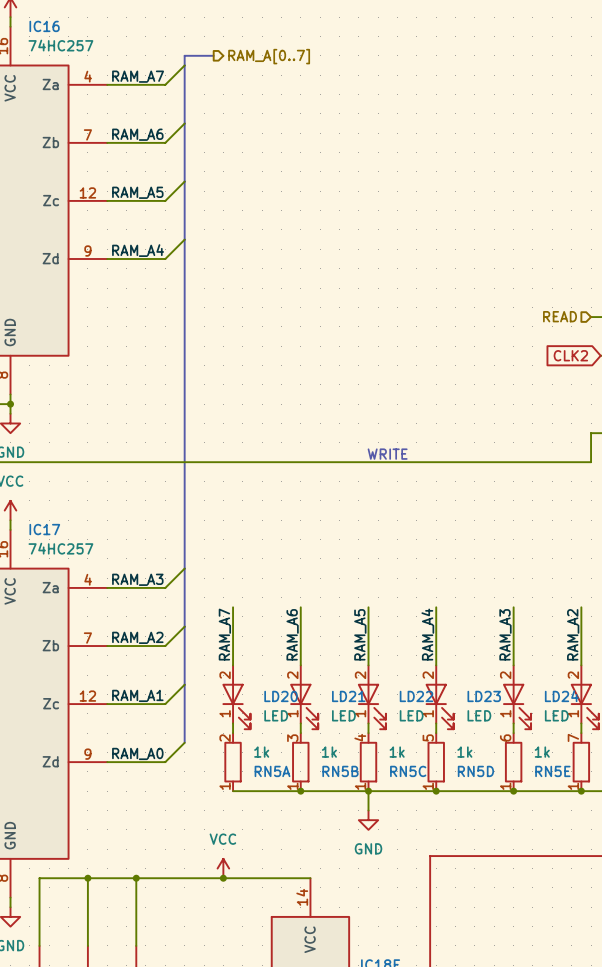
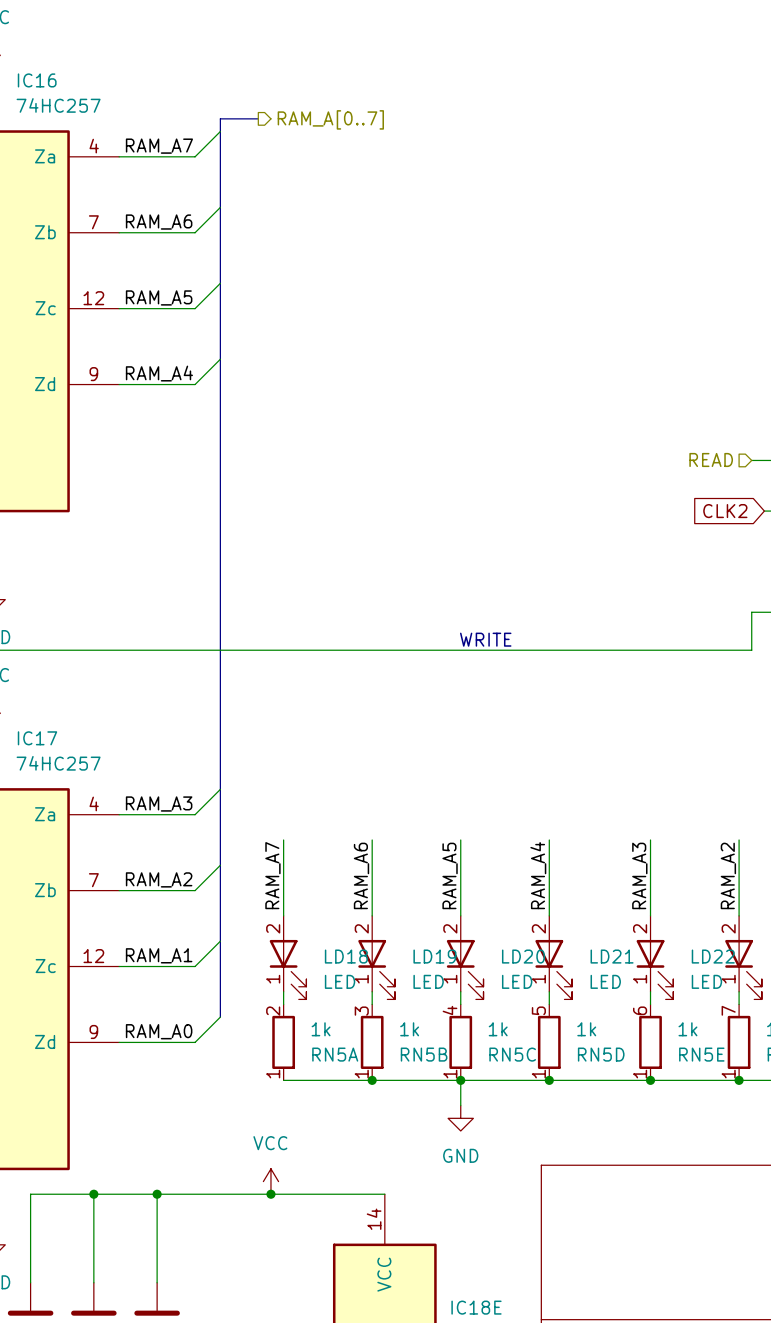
LD20 name: LD20 (281, 696) -> LD18 (346, 956)
LD21 name: LD21 (348, 696) -> LD19 (434, 956)
LD22 name: LD22 (416, 696) -> LD20 (523, 956)
LD23 name: LD23 (484, 696) -> LD21 (612, 956)
LD24 name: LD24 (561, 696) -> LD22 (713, 956)

